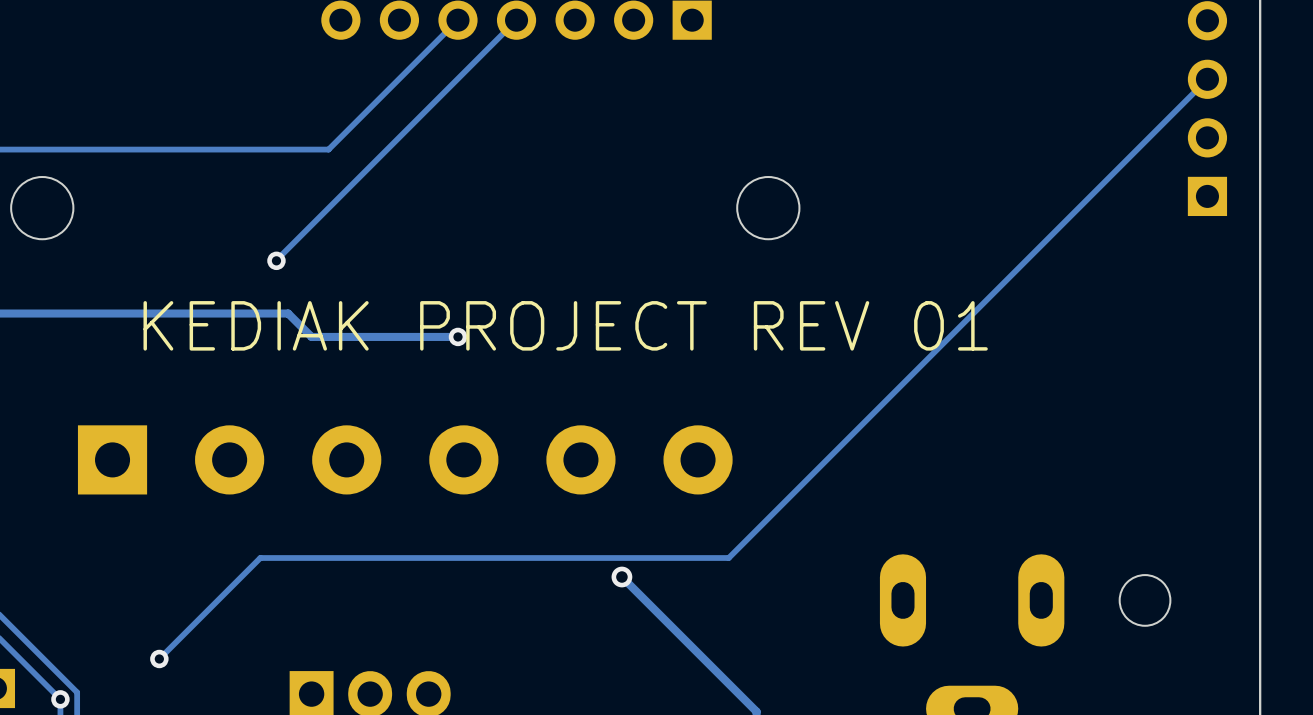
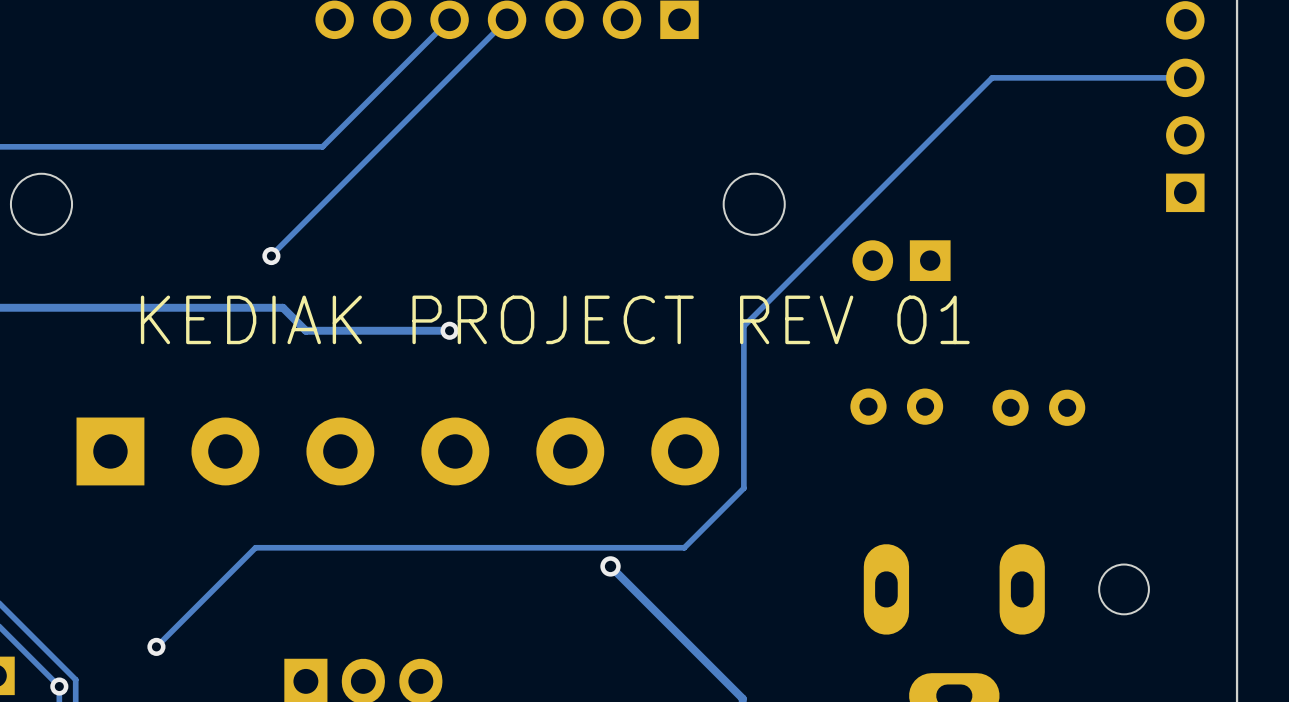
track: (1207, 79) (728, 558) (697, 558) -> (1185, 77) (992, 77) (743, 326) (743, 488) (684, 547)
part: none -> (901, 260)
part: none -> (896, 406)
part: none -> (1038, 407)

